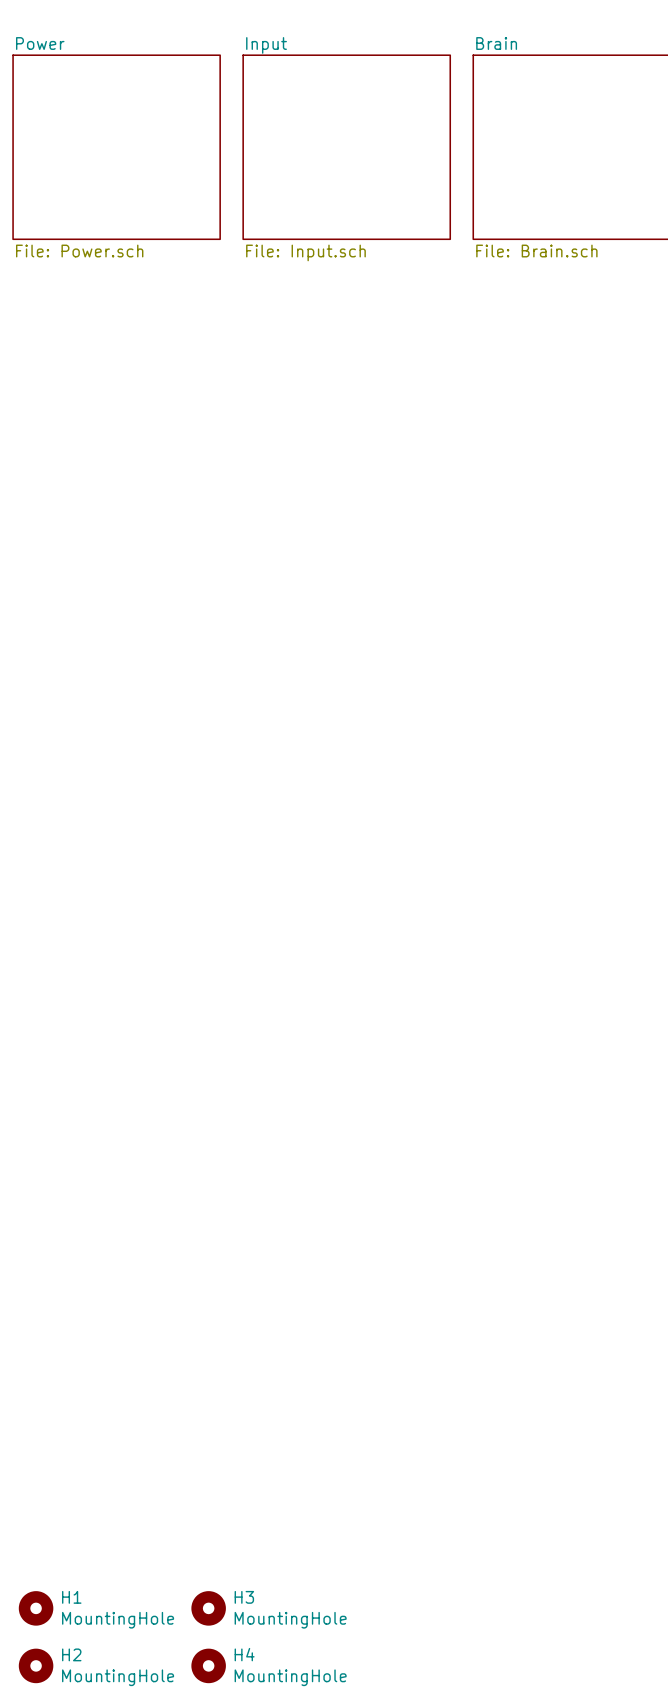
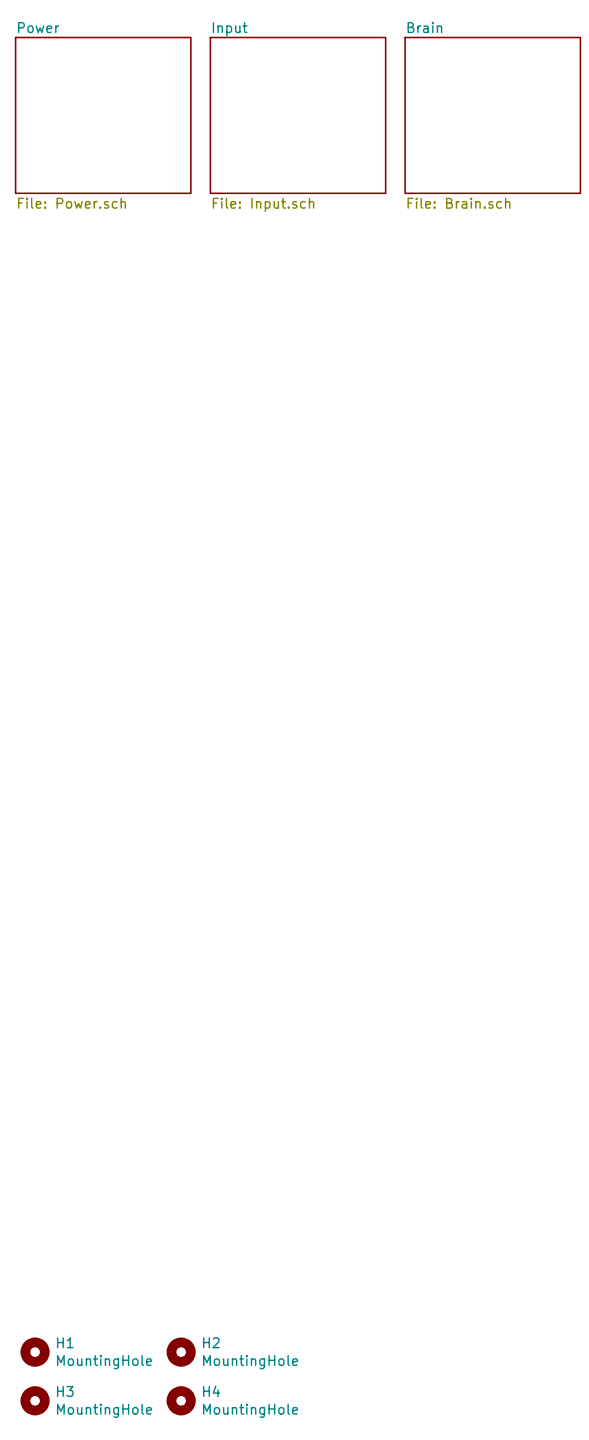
H3 name: H3 (244, 1597) -> H2 (211, 1342)
H2 name: H2 (71, 1654) -> H3 (65, 1391)

